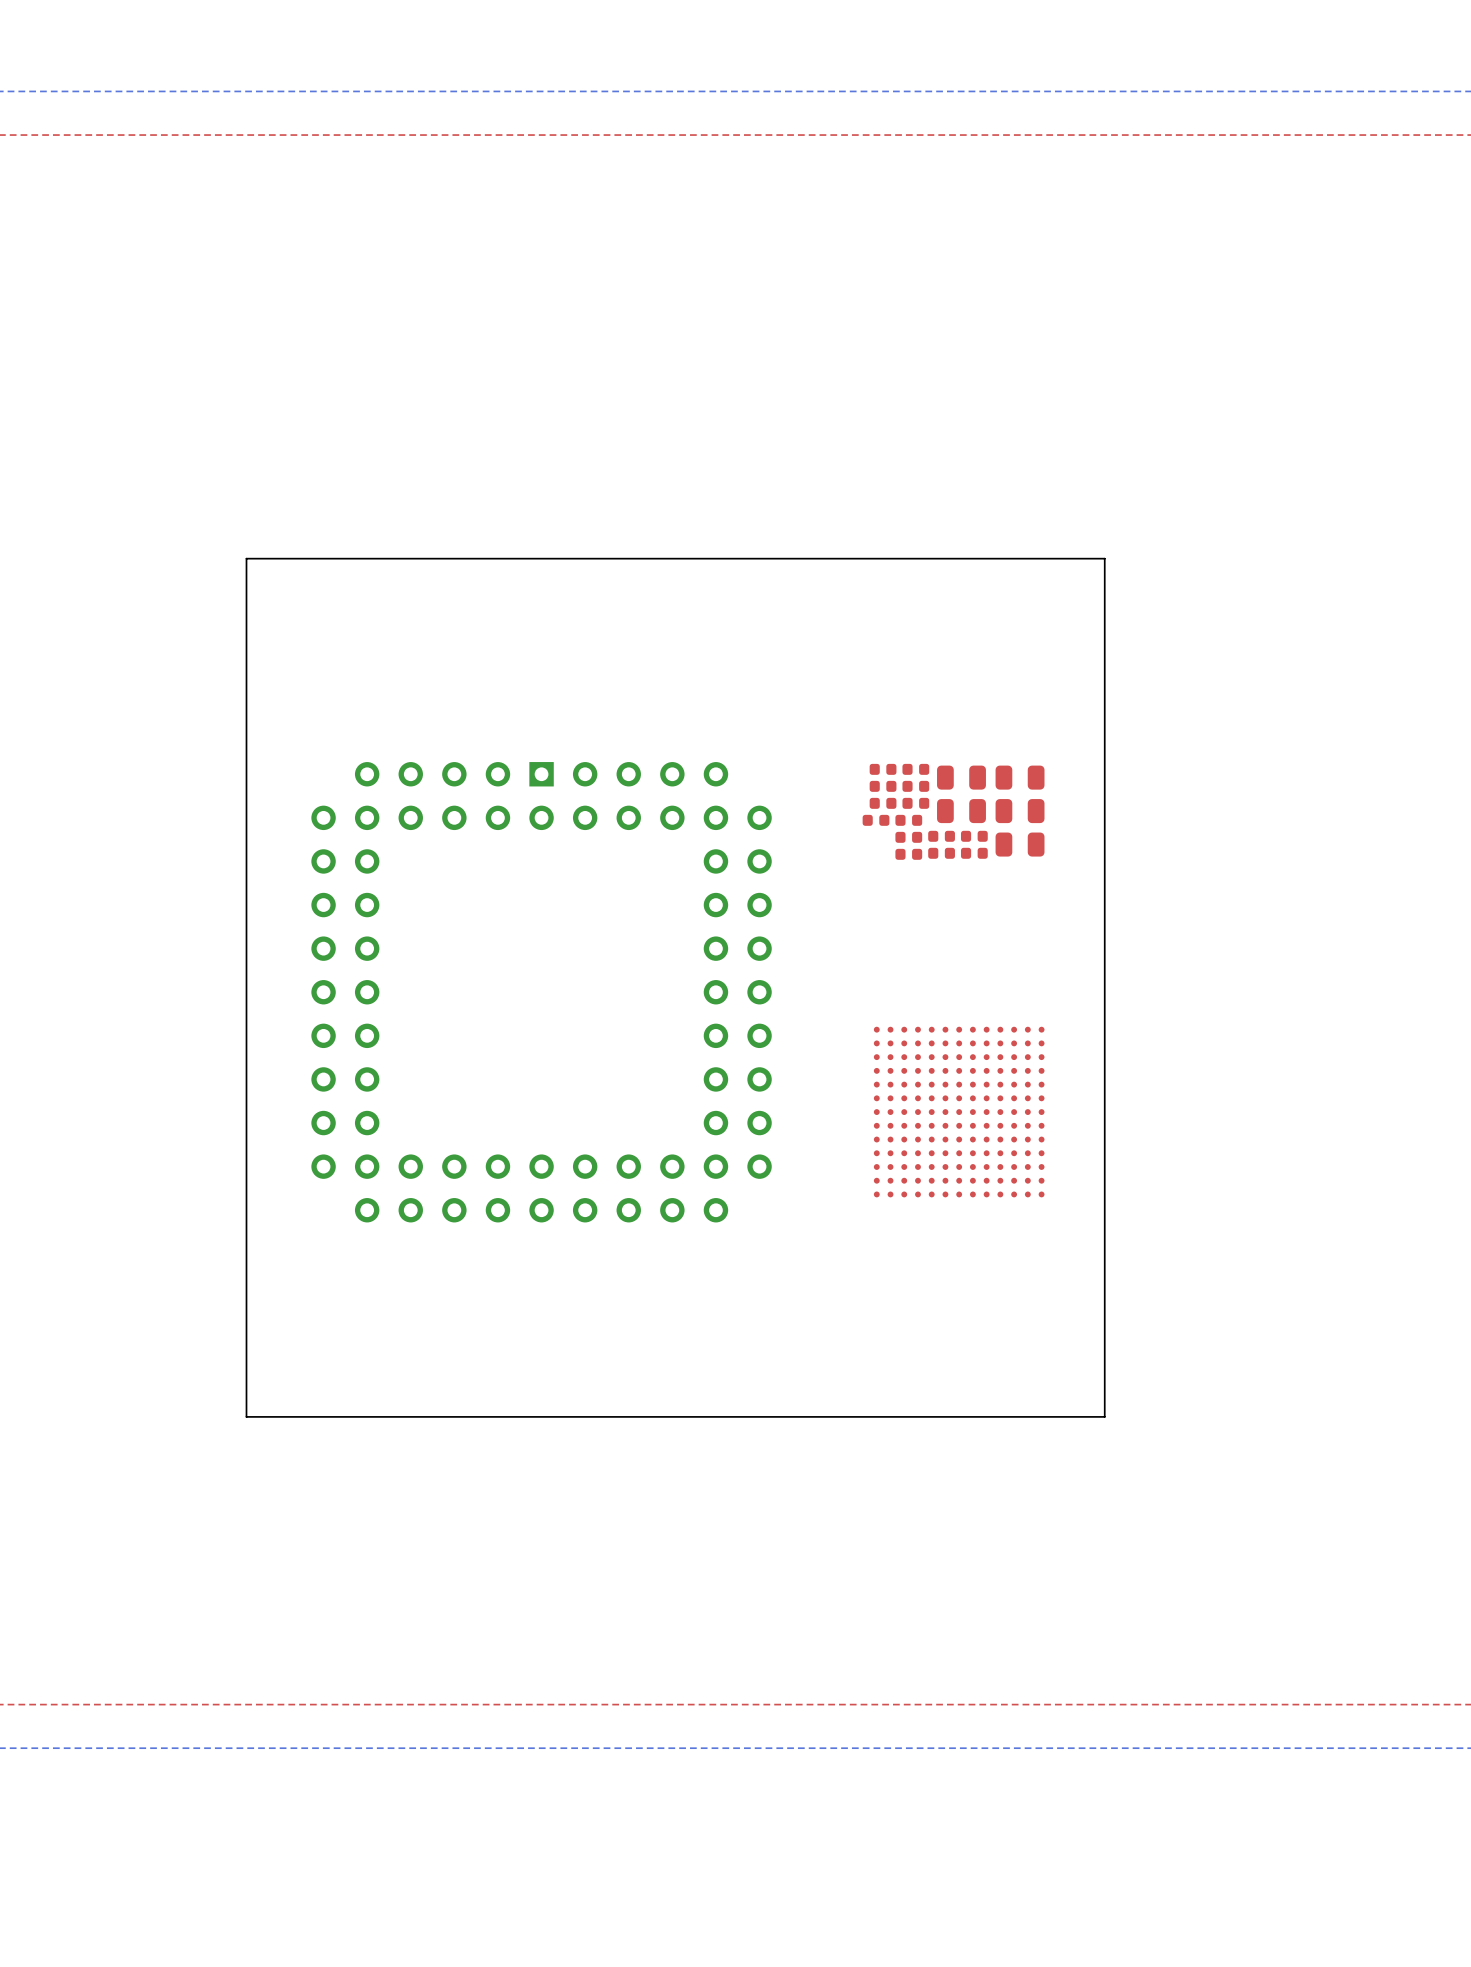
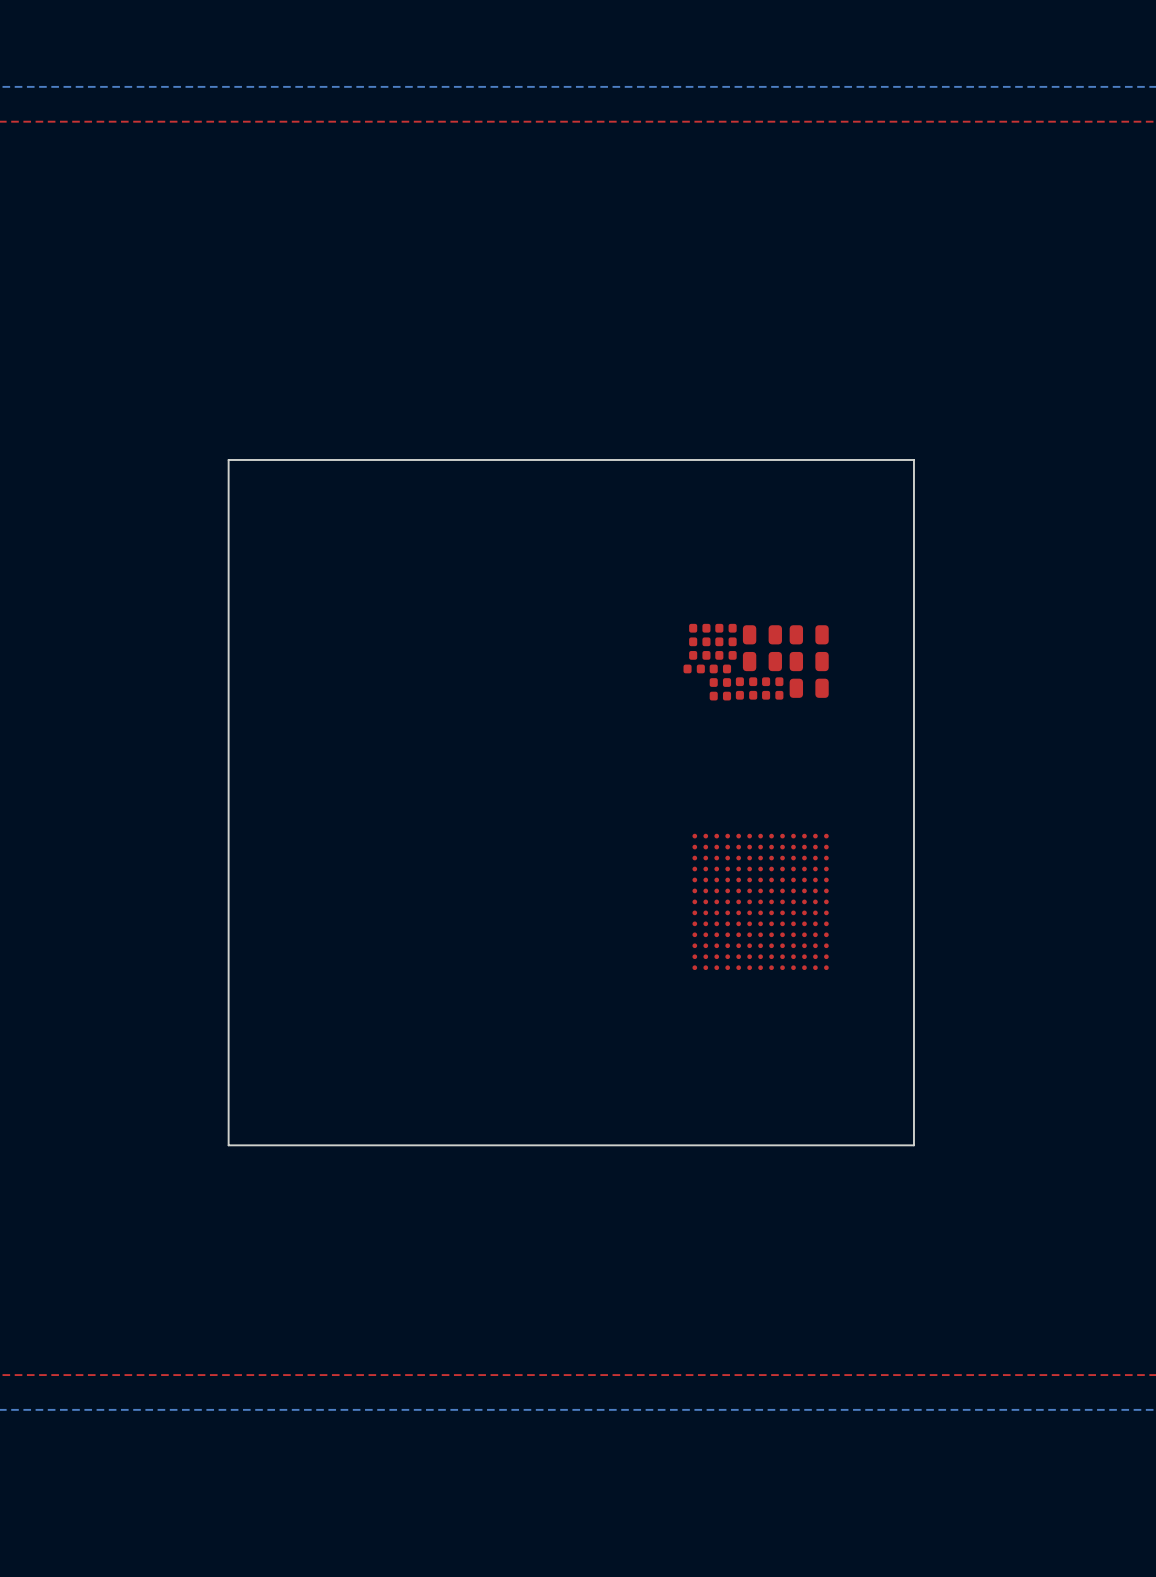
board edge: (293, 558) (246, 558) (246, 1416) (293, 1416) -> (228, 459) (228, 1145)
board edge: (1104, 558) (1104, 1416) -> (876, 459) (913, 459) (913, 1145) (876, 1145)
part: (541, 992) -> none

